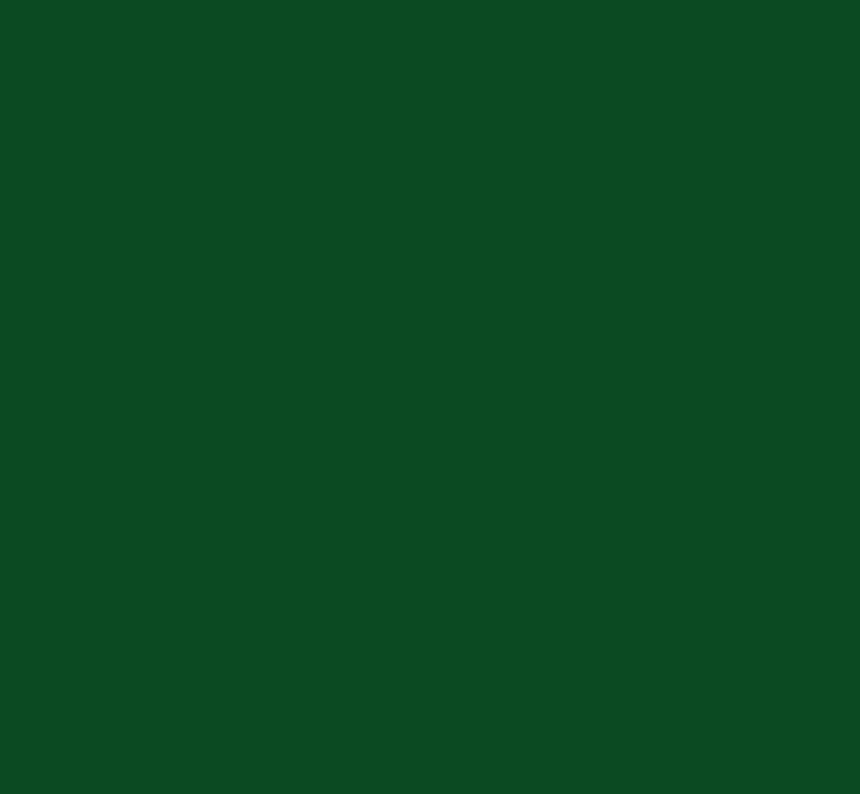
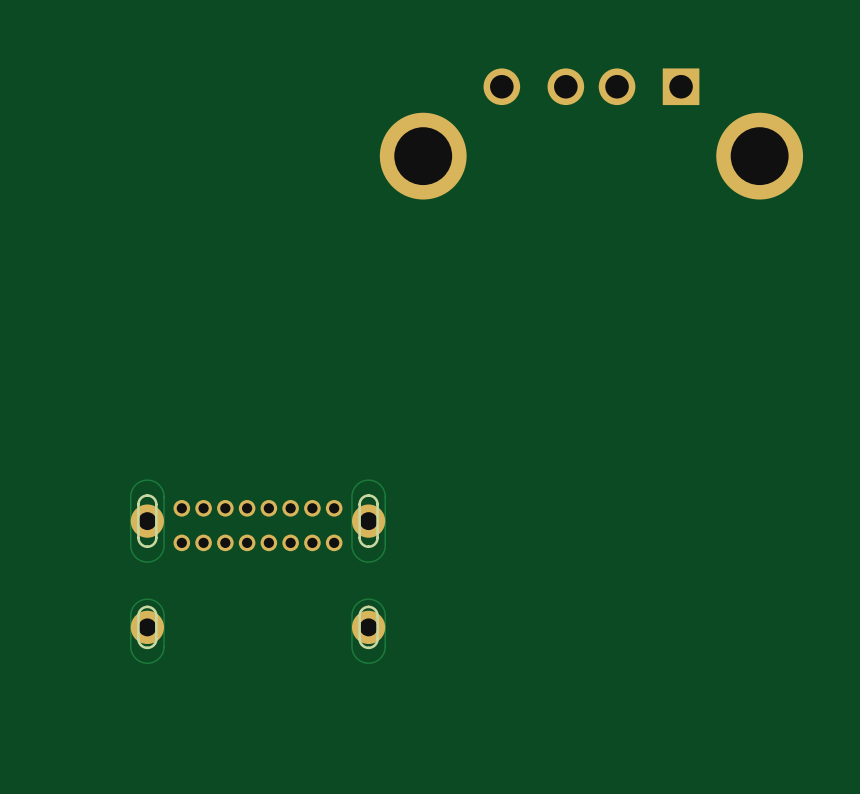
part: none -> (591, 133)
part: none -> (257, 571)

